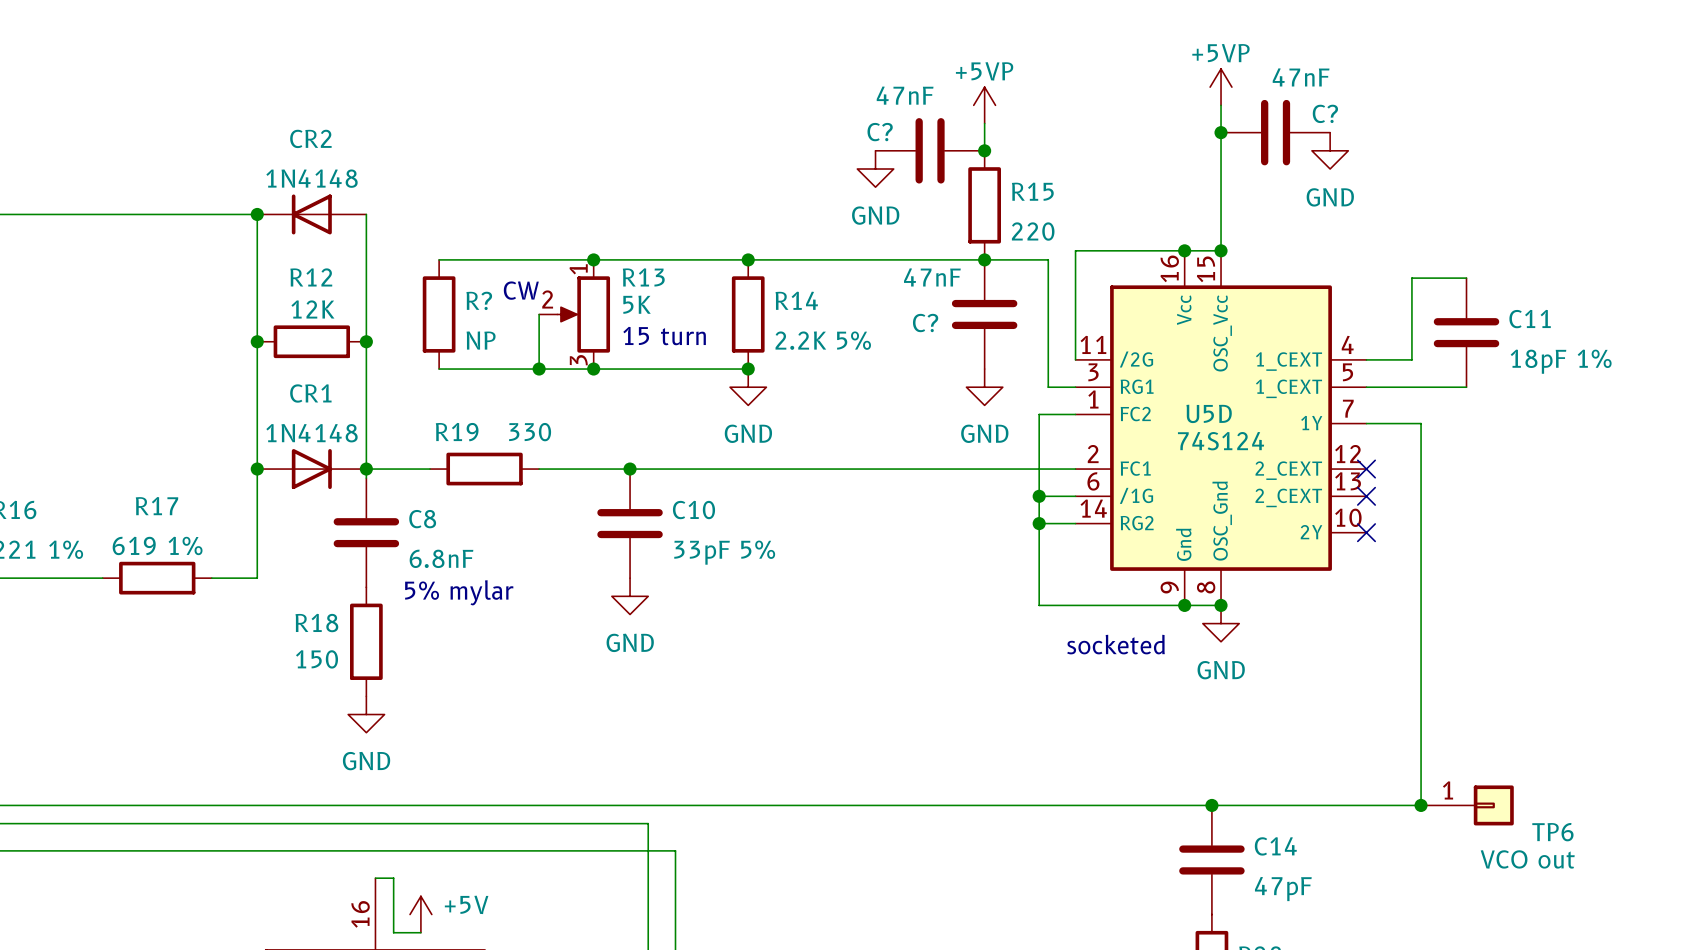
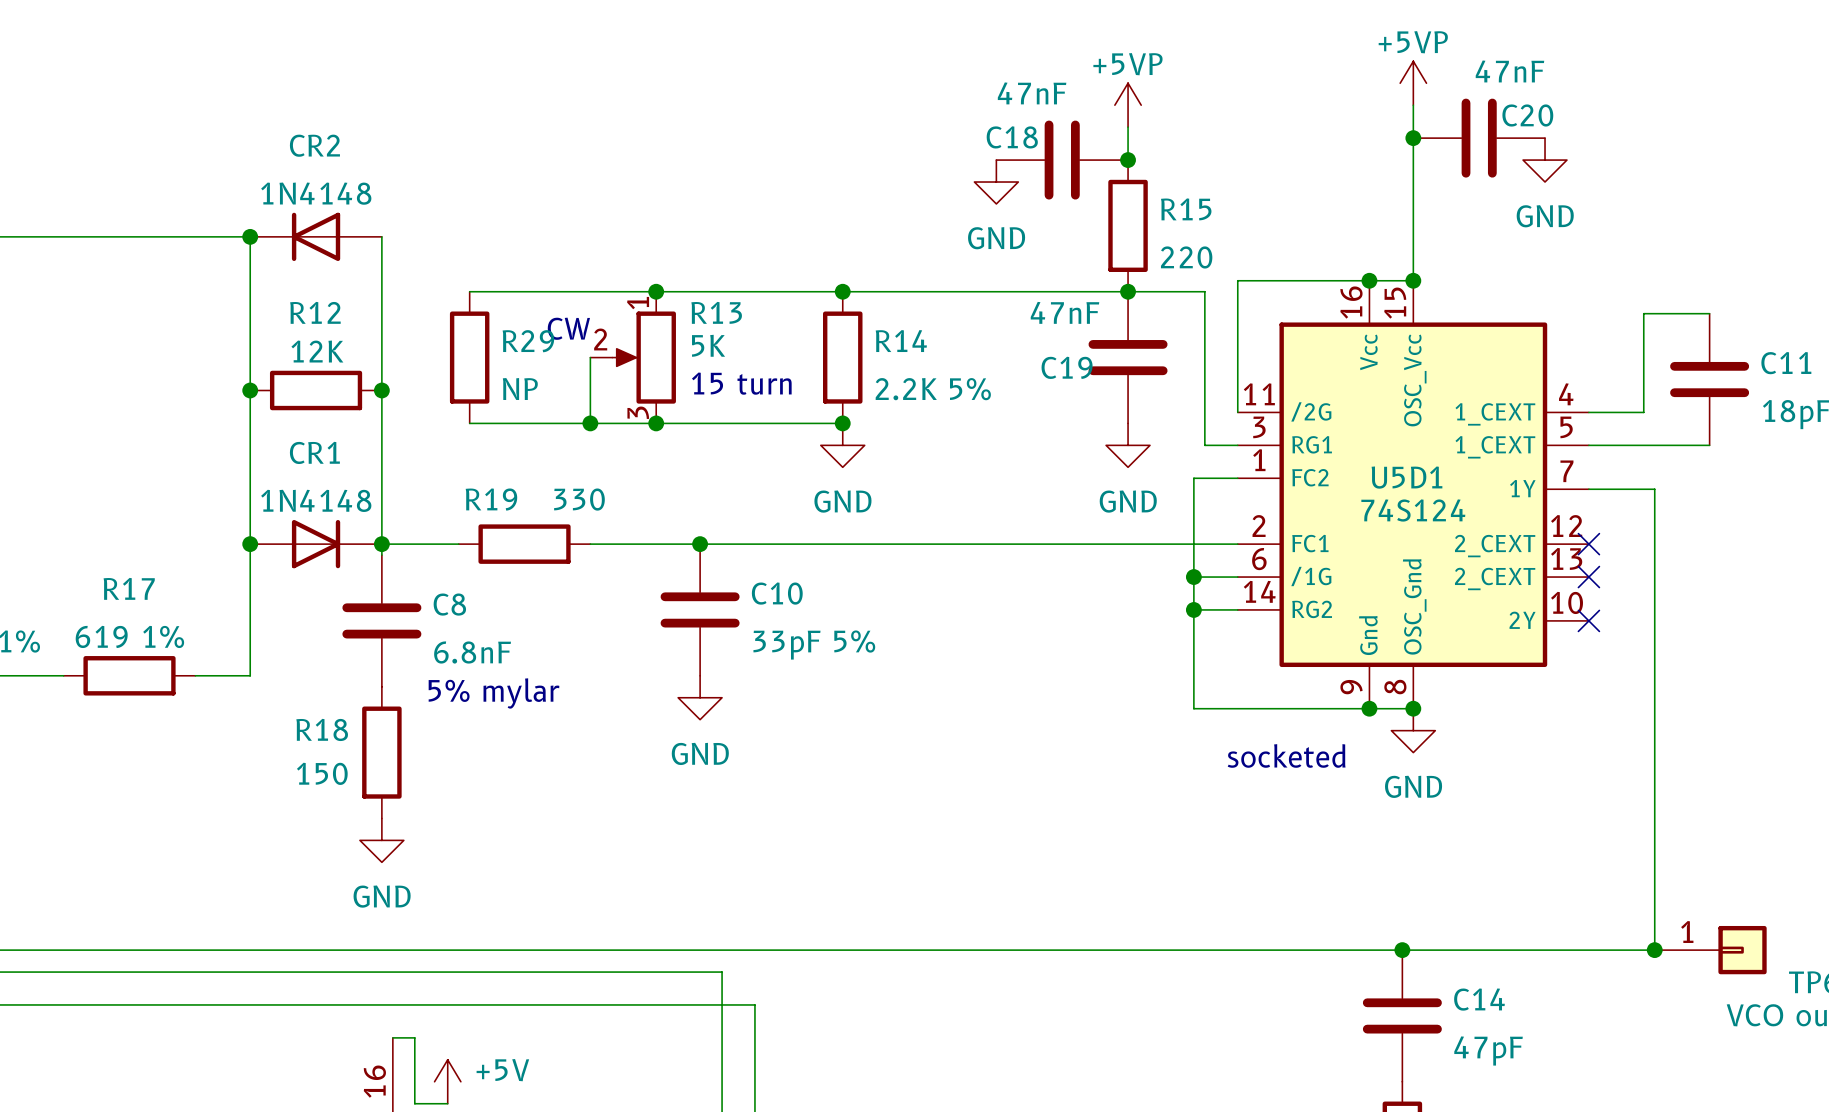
C? name: C? (1325, 113) -> C20 (1527, 115)
C? name: C? (880, 132) -> C18 (1012, 137)
R? name: R? (479, 300) -> R29 (528, 341)
C? name: C? (925, 323) -> C19 (1067, 367)
U5D name: U5D (1209, 413) -> U5D1 (1406, 477)

